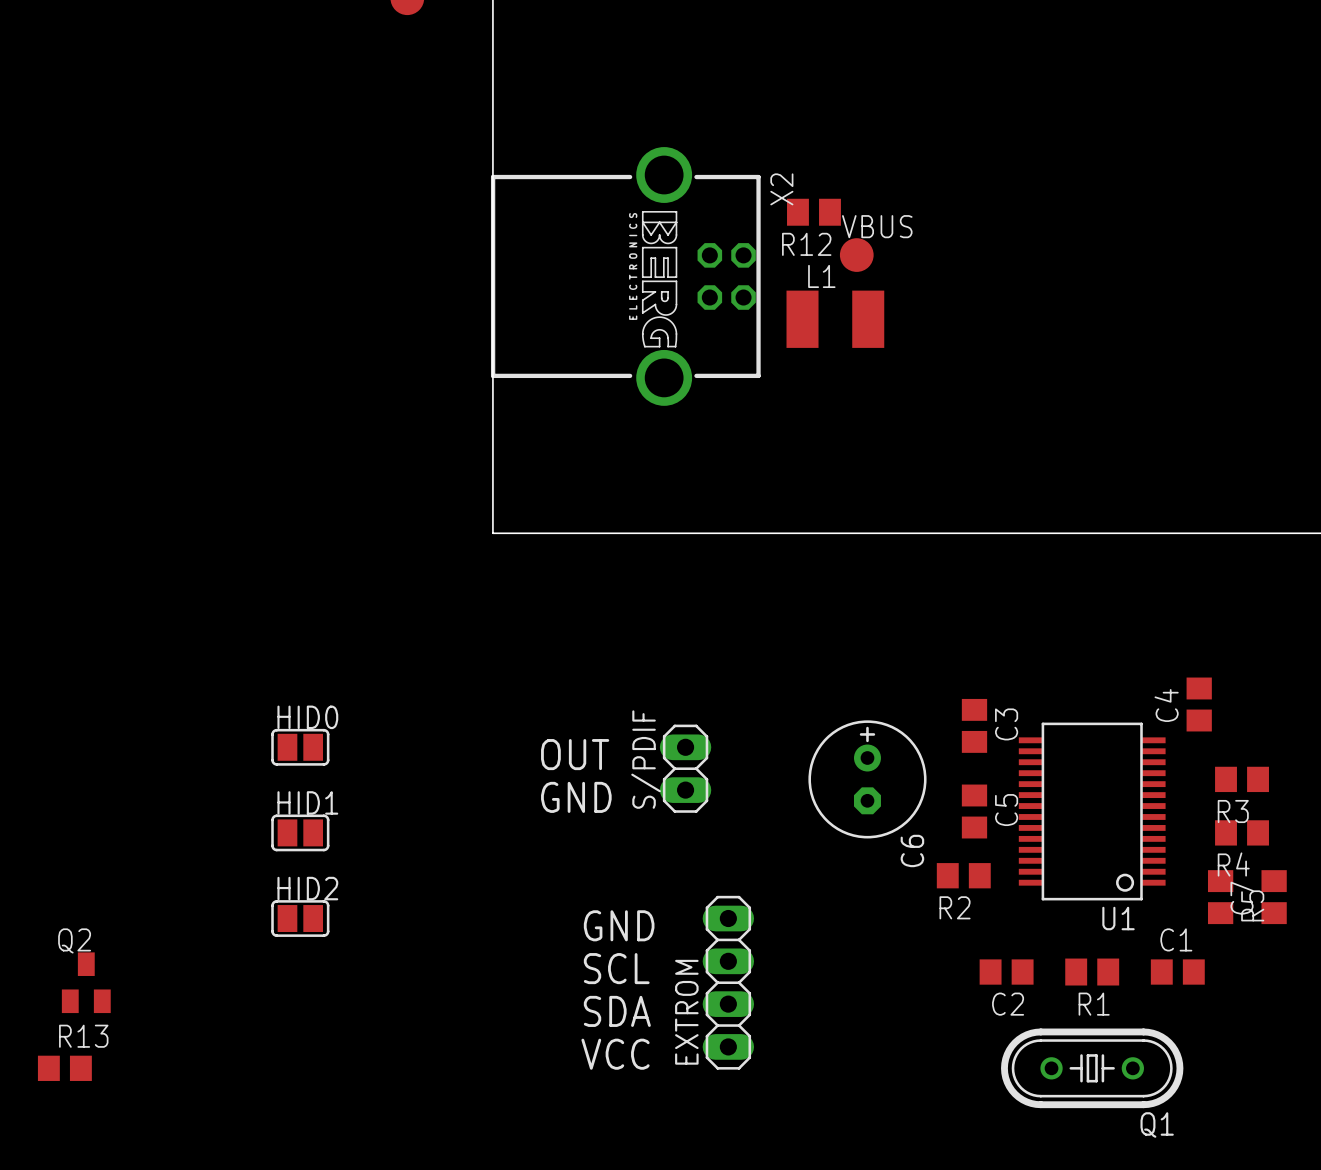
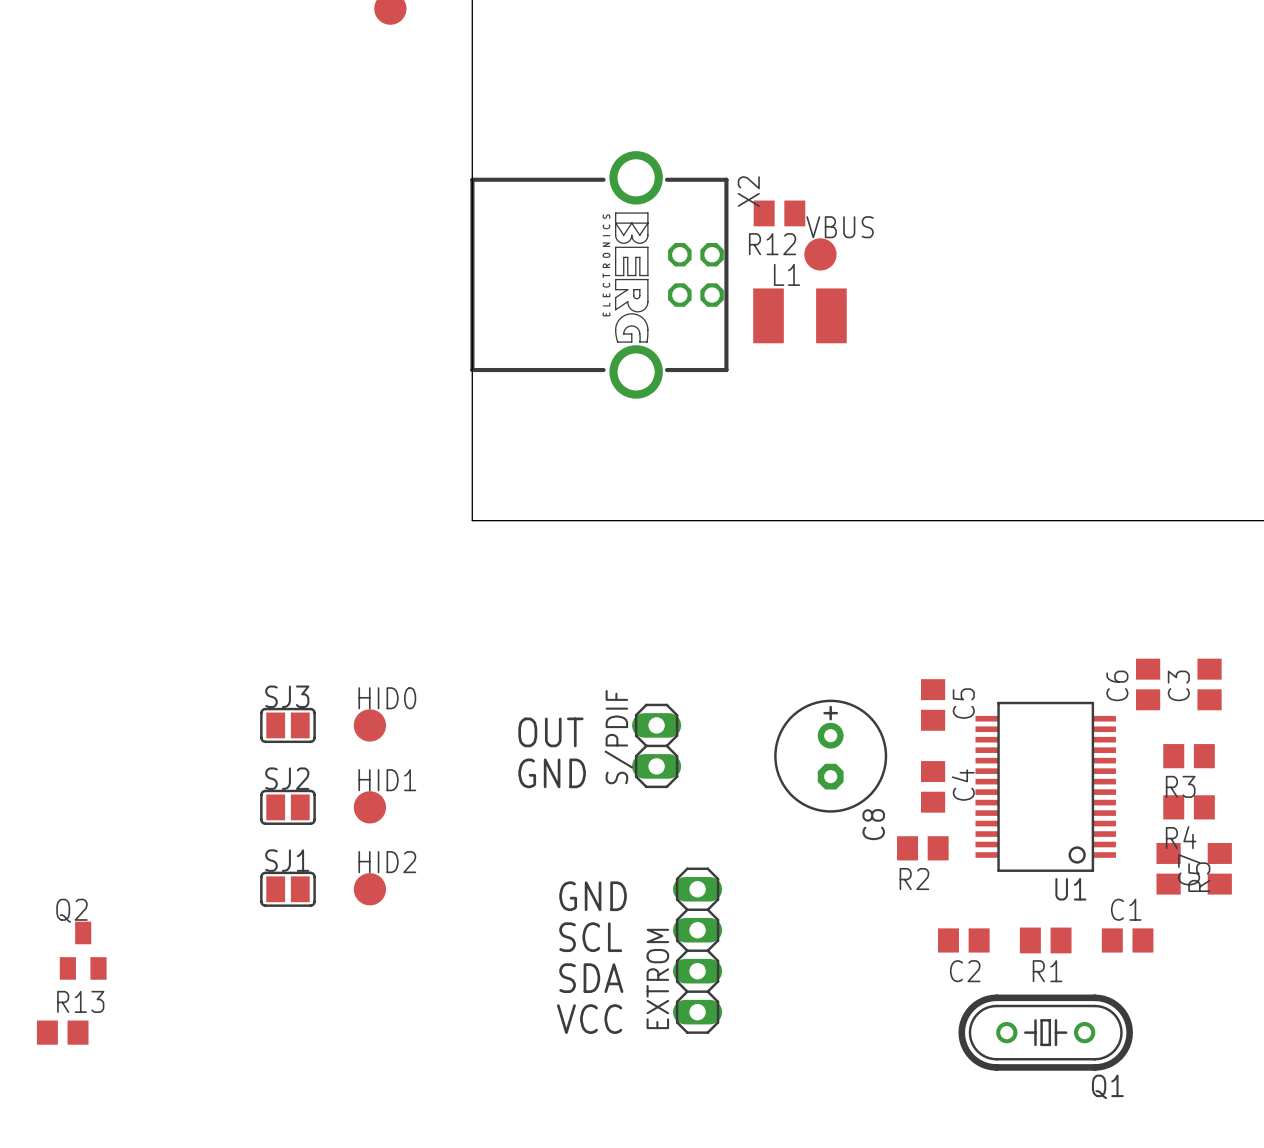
C3: none -> (1209, 684)
C4 name: C4 (1166, 705) -> C6 (1117, 685)
HID0 name: HID0 (307, 717) -> SJ3 (287, 696)
C3 name: C3 (1006, 724) -> C5 (963, 703)
HID0: none -> (369, 725)
HID1 name: HID1 (307, 802) -> SJ2 (287, 778)
C5 name: C5 (1006, 810) -> C4 (963, 785)
HID1: none -> (369, 807)
C6 name: C6 (912, 850) -> C8 (873, 824)
HID2 name: HID2 (307, 888) -> SJ1 (287, 860)
HID2: none -> (369, 889)

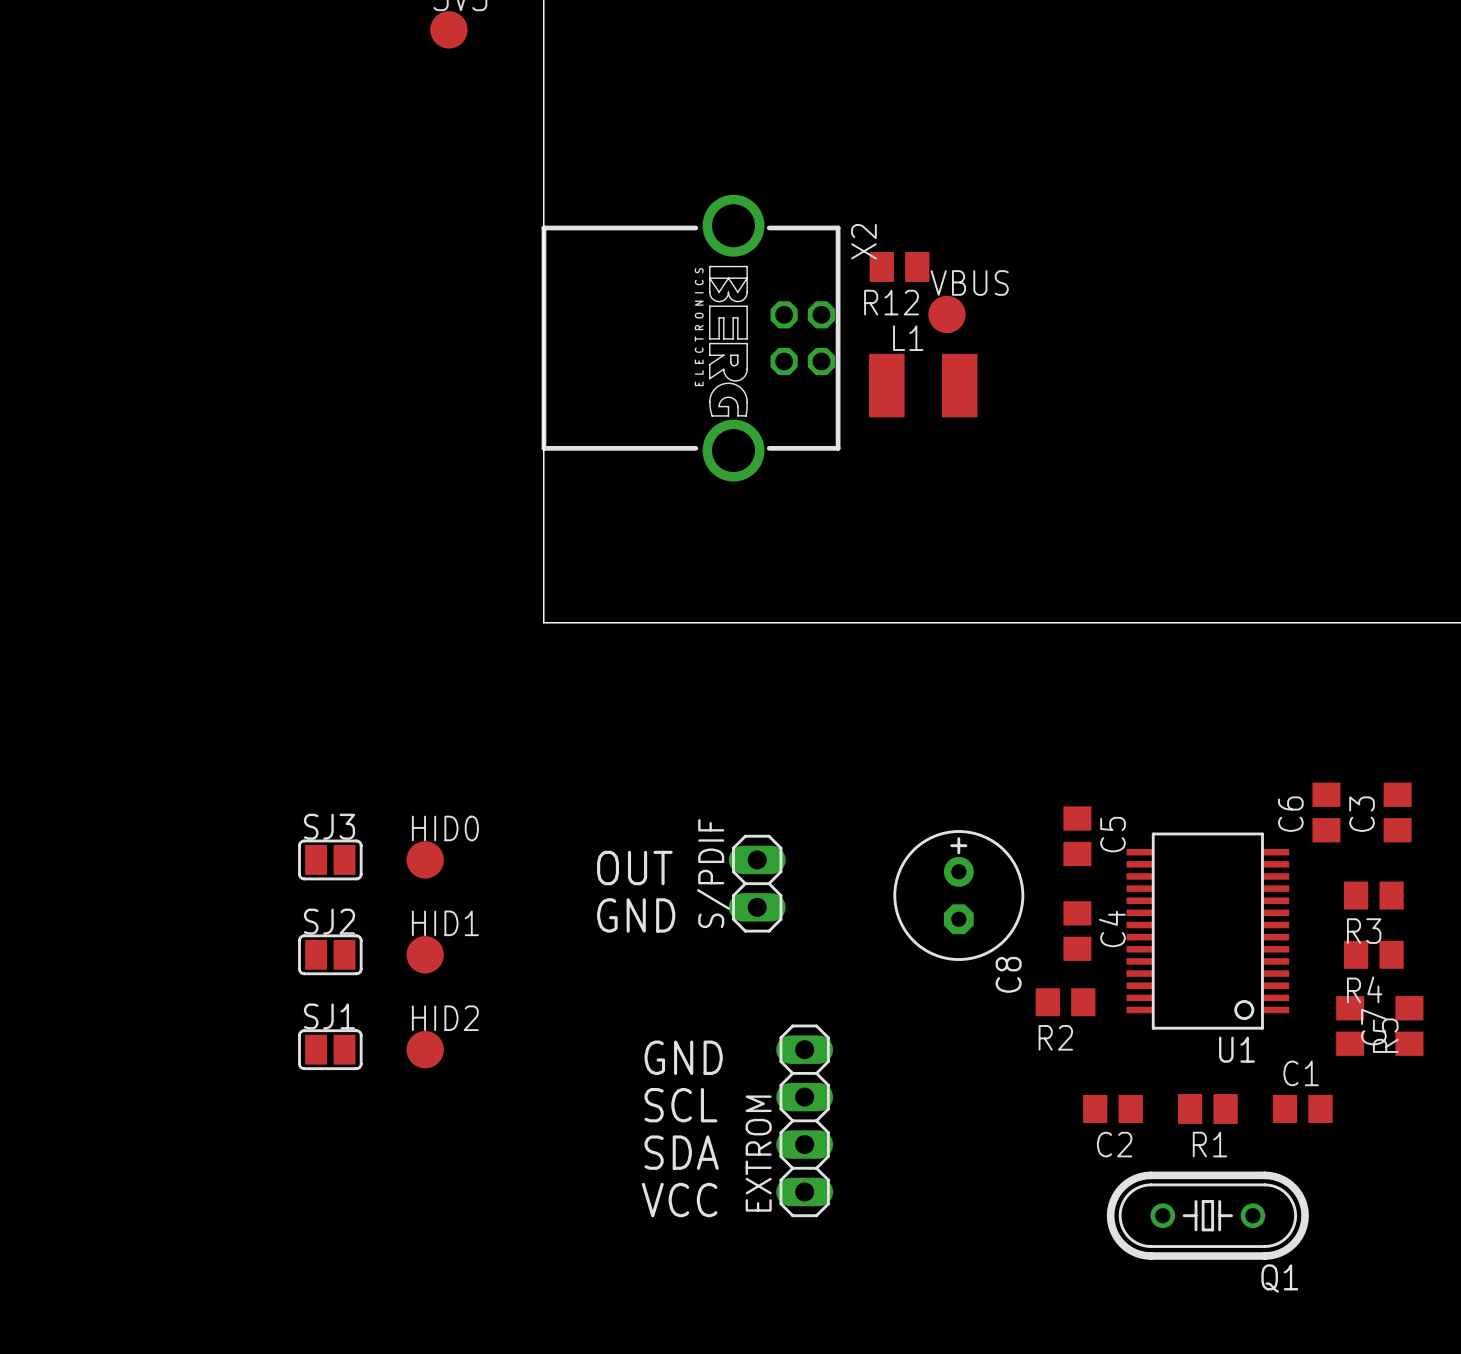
Q2: (83, 950) -> none
R13: (62, 1032) -> none

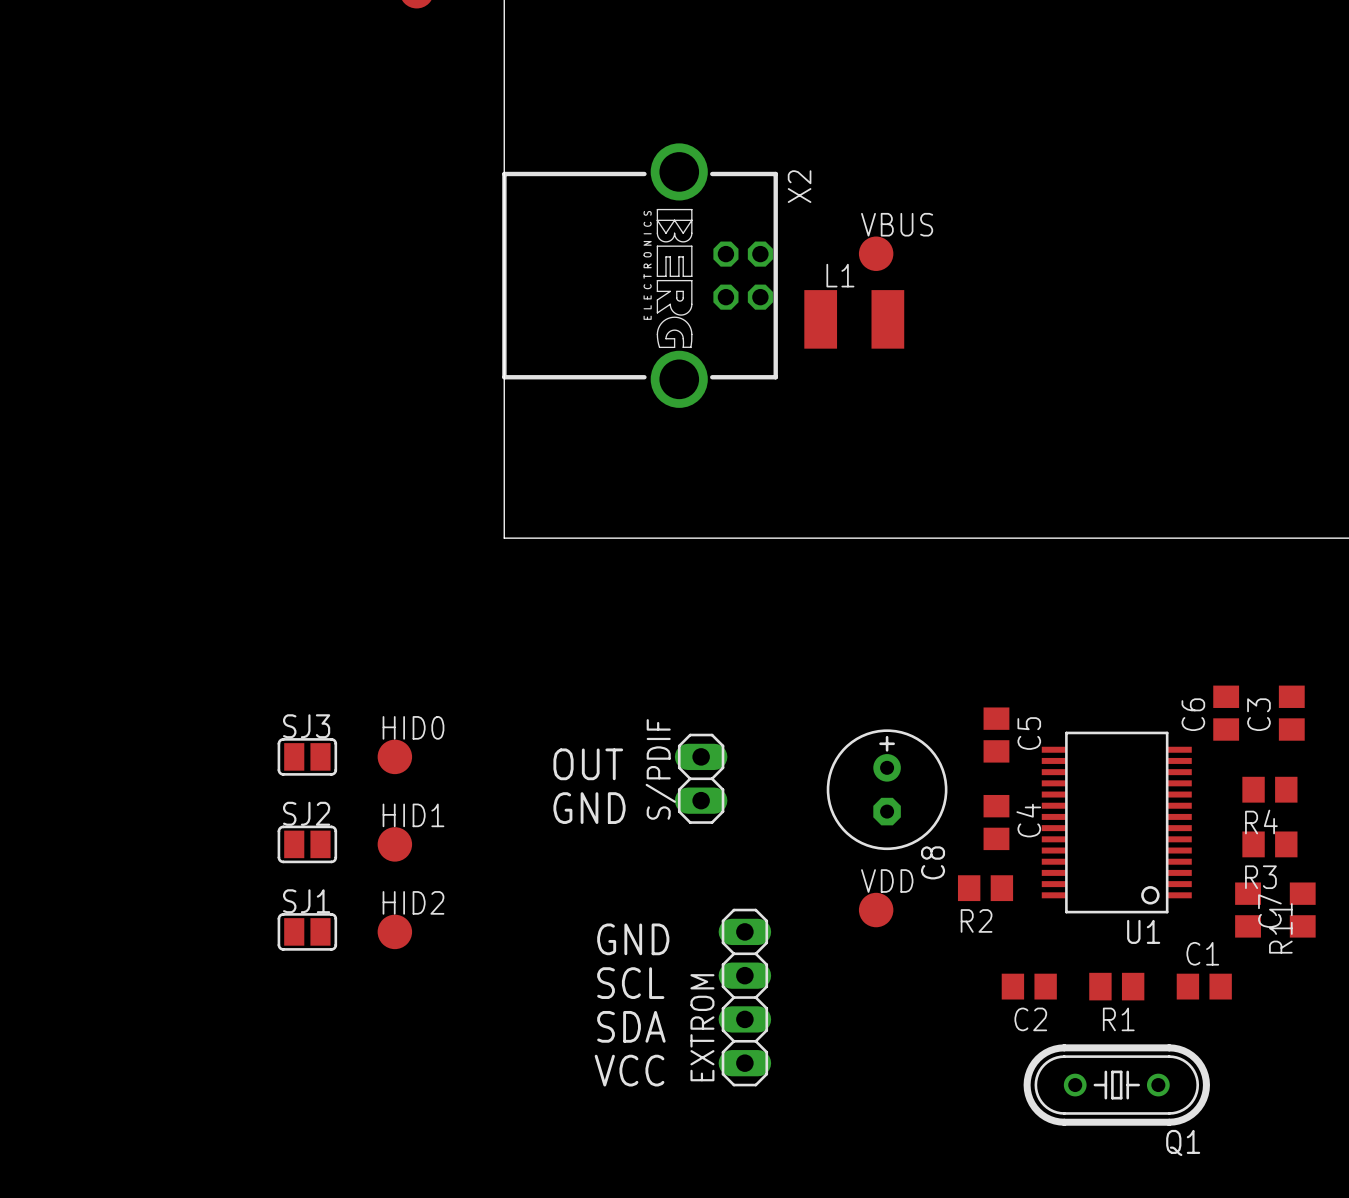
R12: (899, 267) -> none
R3 name: R3 (1364, 931) -> R4 (1261, 822)
R4 name: R4 (1364, 989) -> R3 (1260, 877)
VDD: none -> (876, 910)
R5 name: R5 (1385, 1035) -> R11 (1280, 928)

